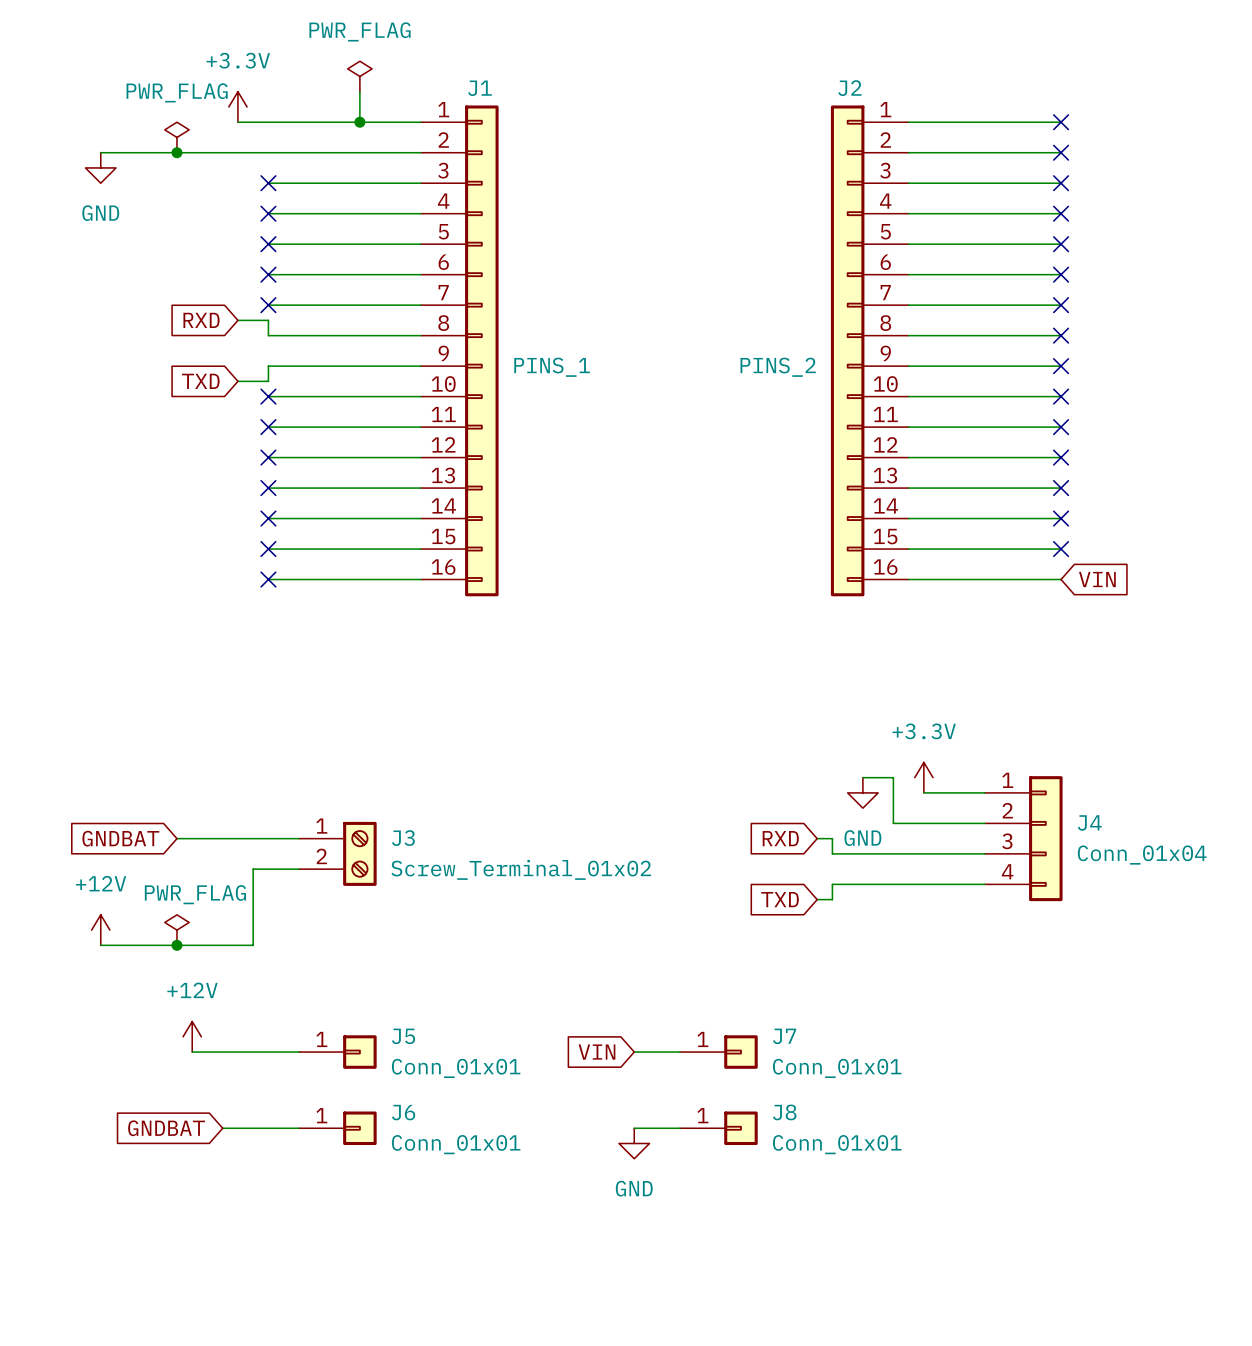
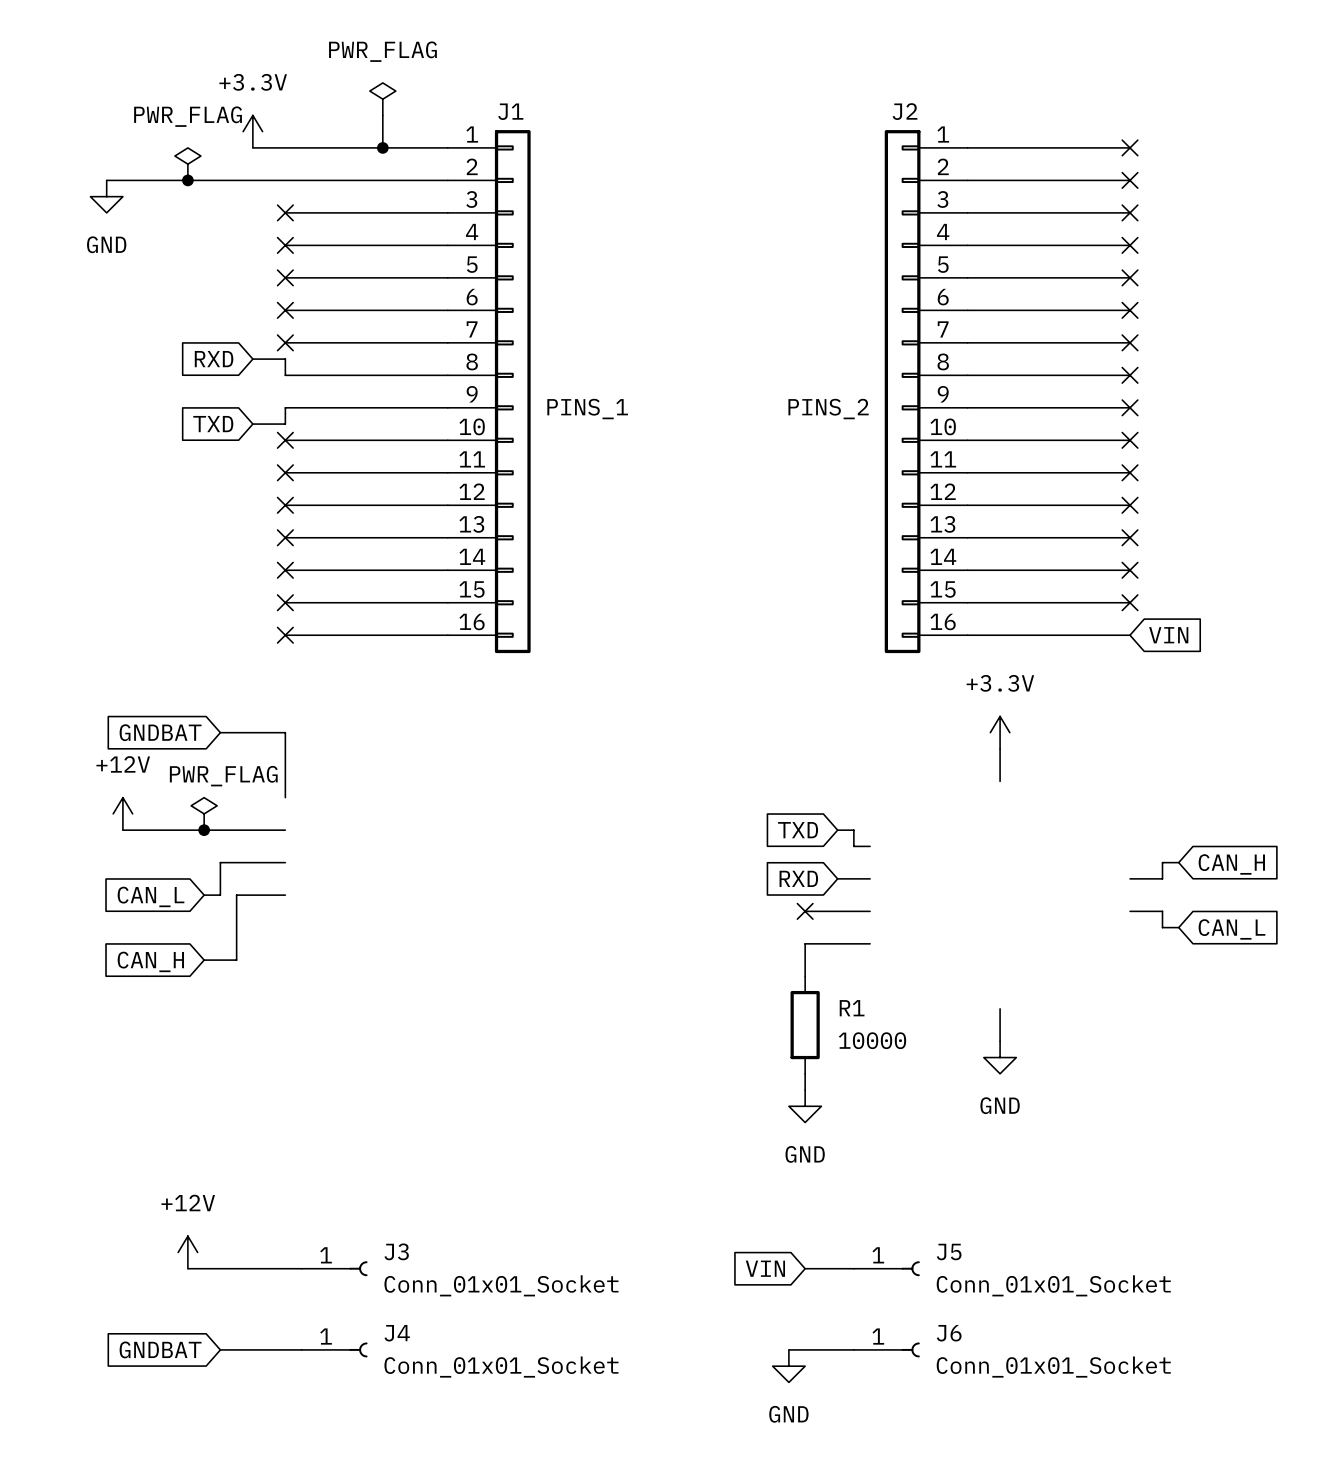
wire: none -> (220, 732) (285, 732) (285, 797)
wire: none -> (1000, 748) (1000, 781)
power symbol: none -> +12V (122, 813)
wire: none -> (122, 830) (285, 830)
junction: none -> (204, 830)
wire: none -> (837, 830) (853, 830) (853, 846) (870, 846)
J4 symbol: [984, 776, 1063, 902] -> [301, 1342, 368, 1358]
wire: (862, 777) (893, 777) (893, 823) (984, 823) -> none
power symbol position: +3.3V (923, 777) -> +3.3V (1000, 732)
wire: none -> (285, 862) (220, 862) (220, 895) (204, 895)
power symbol: GND (862, 792) -> none
wire: (923, 792) (984, 792) -> none
wire: none -> (1178, 862) (1162, 862) (1162, 878) (1130, 878)
global label: none -> CAN_H (1231, 864)
wire: none -> (837, 878) (870, 878)
J3 symbol: [298, 821, 377, 886] -> [301, 1261, 368, 1277]
wire: none -> (285, 895) (236, 895) (236, 960) (204, 960)
global label: none -> CAN_L (151, 896)
global label position: GNDBAT (120, 838) -> GNDBAT (160, 732)
wire: (176, 838) (298, 838) -> none
no-connect mark: none -> (805, 911)
global label position: RXD (780, 838) -> RXD (798, 878)
wire: (817, 838) (832, 838) (832, 853) (984, 853) -> (870, 911) (805, 911)
wire: none -> (1130, 911) (1162, 911) (1162, 927) (1178, 927)
J4 value: Conn_01x04 (1142, 855) -> Conn_01x01_Socket (501, 1367)
global label: none -> CAN_L (1231, 929)
wire: (298, 869) (253, 869) (253, 945) (100, 945) -> none
J3 value: Screw_Terminal_01x02 (521, 869) -> Conn_01x01_Socket (501, 1285)
wire: none -> (870, 943) (805, 943) (805, 976)
wire: (984, 884) (832, 884) (832, 899) (817, 899) -> none
global label: none -> CAN_H (150, 961)
global label position: TXD (780, 899) -> TXD (798, 830)
power symbol: +12V (100, 930) -> none
power symbol position: PWR_FLAG (176, 930) -> PWR_FLAG (204, 813)
wire: none -> (1000, 1008) (1000, 1041)
junction: (176, 945) -> none
R1: none -> 10000 (805, 1025)
power symbol: none -> GND (1000, 1057)
wire: none -> (805, 1073) (805, 1090)
power symbol: none -> GND (805, 1106)
J5 symbol: [298, 1035, 377, 1069] -> [853, 1261, 920, 1277]
power symbol: +12V (192, 1036) -> none
wire: (192, 1052) (298, 1052) -> (187, 1268) (301, 1268)
global label position: VIN (596, 1052) -> VIN (765, 1268)
wire: (634, 1052) (679, 1052) -> none
J7: Conn_01x01 (718, 1052) -> none
J5 value: Conn_01x01 (456, 1068) -> Conn_01x01_Socket (1053, 1285)
J6 symbol: [298, 1111, 377, 1146] -> [853, 1342, 920, 1358]
global label position: GNDBAT (166, 1128) -> GNDBAT (160, 1349)
wire: (222, 1128) (298, 1128) -> (220, 1349) (301, 1349)
wire: (634, 1128) (679, 1128) -> (805, 1268) (853, 1268)
J8: Conn_01x01 (718, 1128) -> none
power symbol: GND (634, 1143) -> none
J6 value: Conn_01x01 (456, 1144) -> Conn_01x01_Socket (1053, 1367)
power symbol: none -> +12V (187, 1252)
wire: none -> (788, 1349) (853, 1349)
power symbol: none -> GND (788, 1366)

